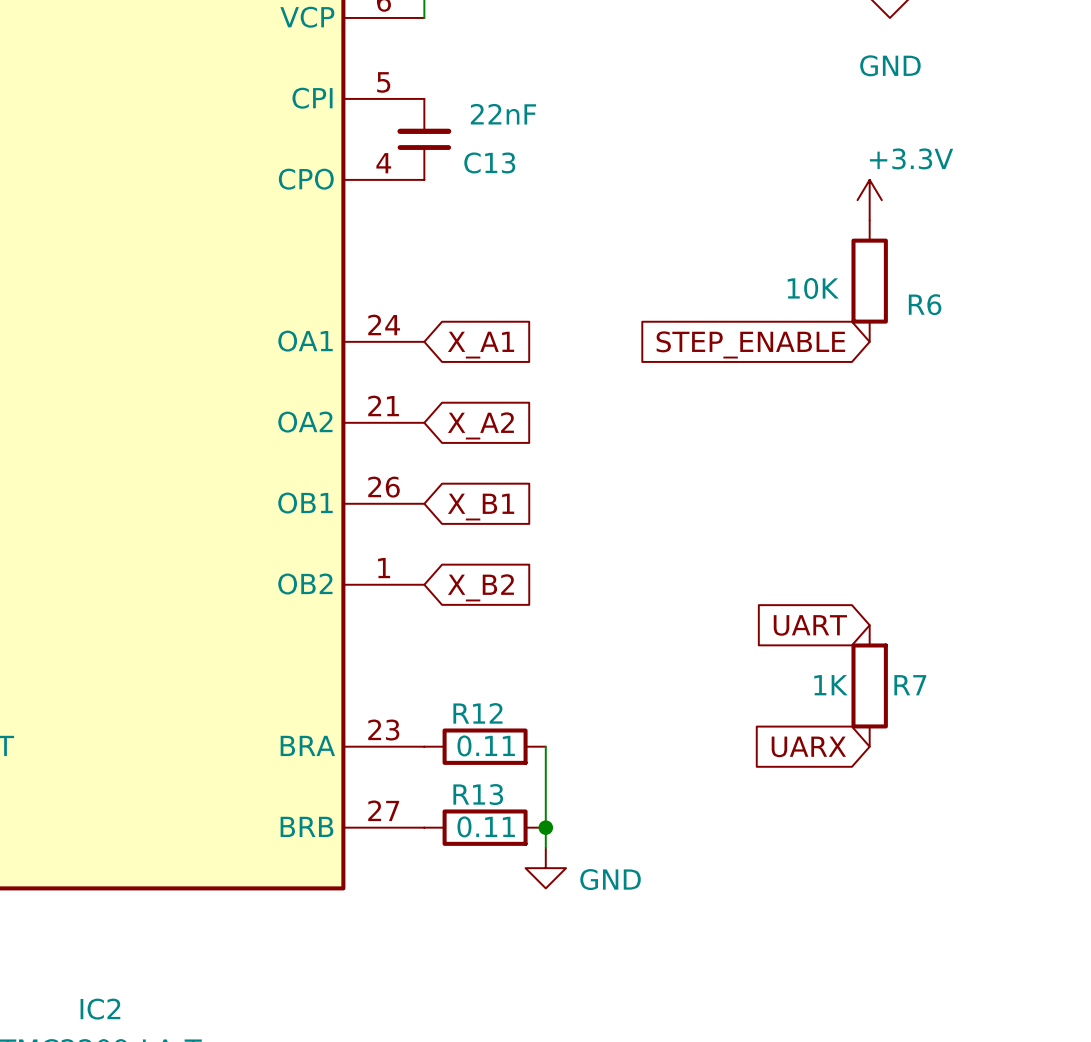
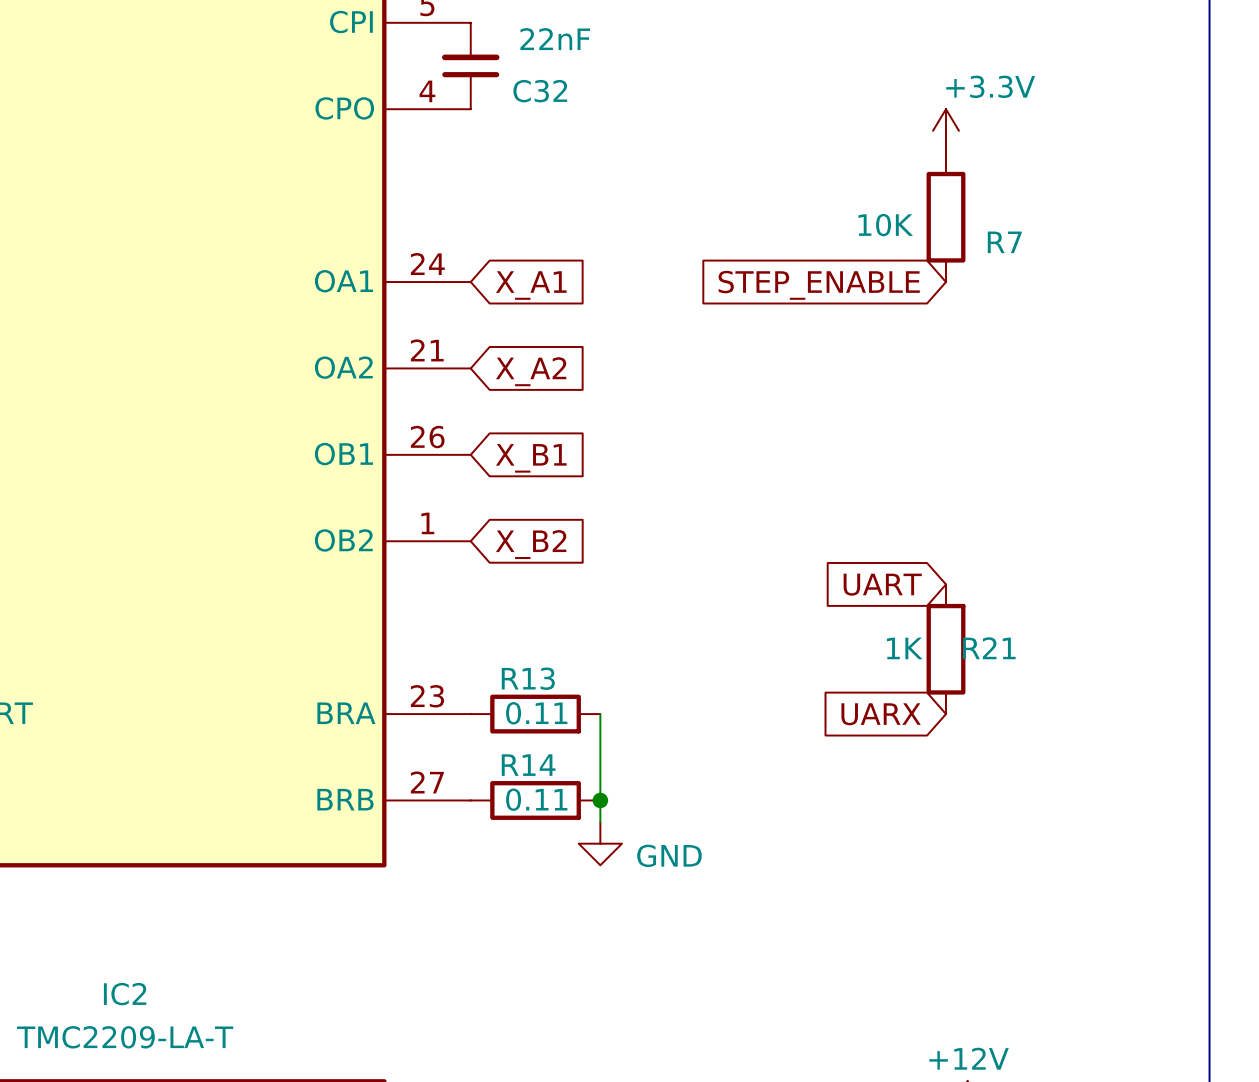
C13 name: C13 (489, 162) -> C32 (540, 91)
R6 name: R6 (925, 304) -> R7 (1004, 242)
R7 name: R7 (910, 685) -> R21 (989, 648)
R12 name: R12 (477, 713) -> R13 (528, 678)
R13 name: R13 (478, 794) -> R14 (528, 765)

